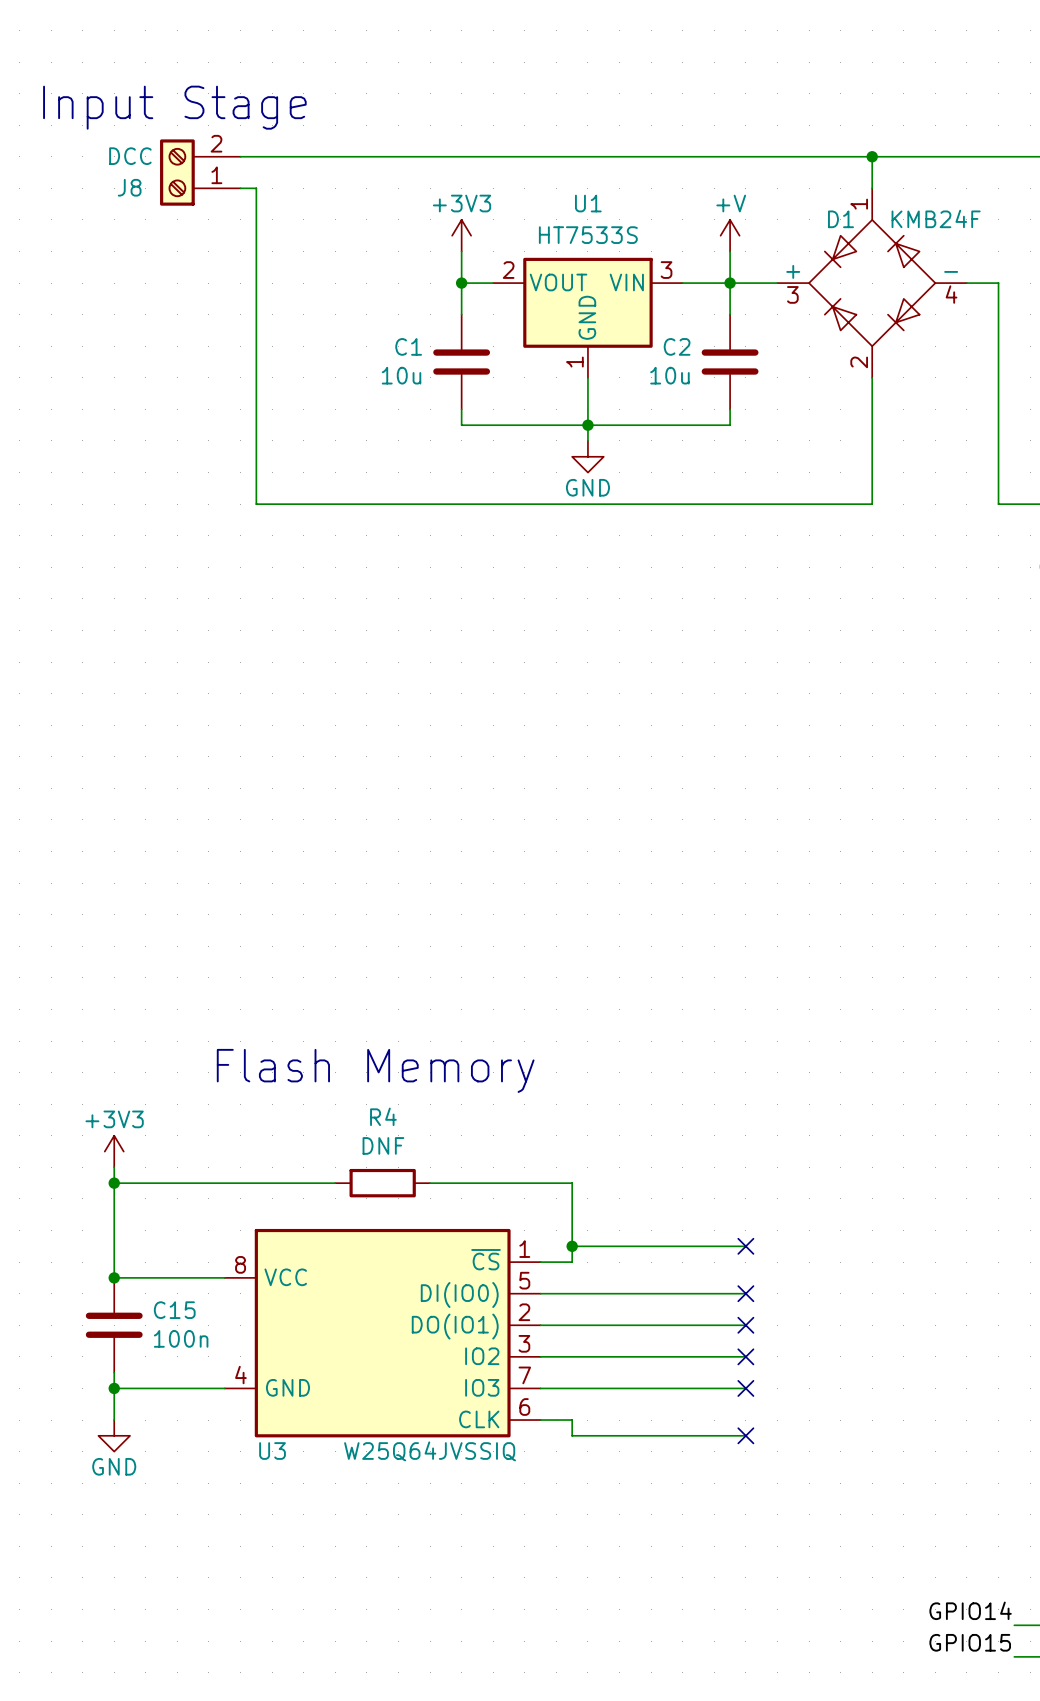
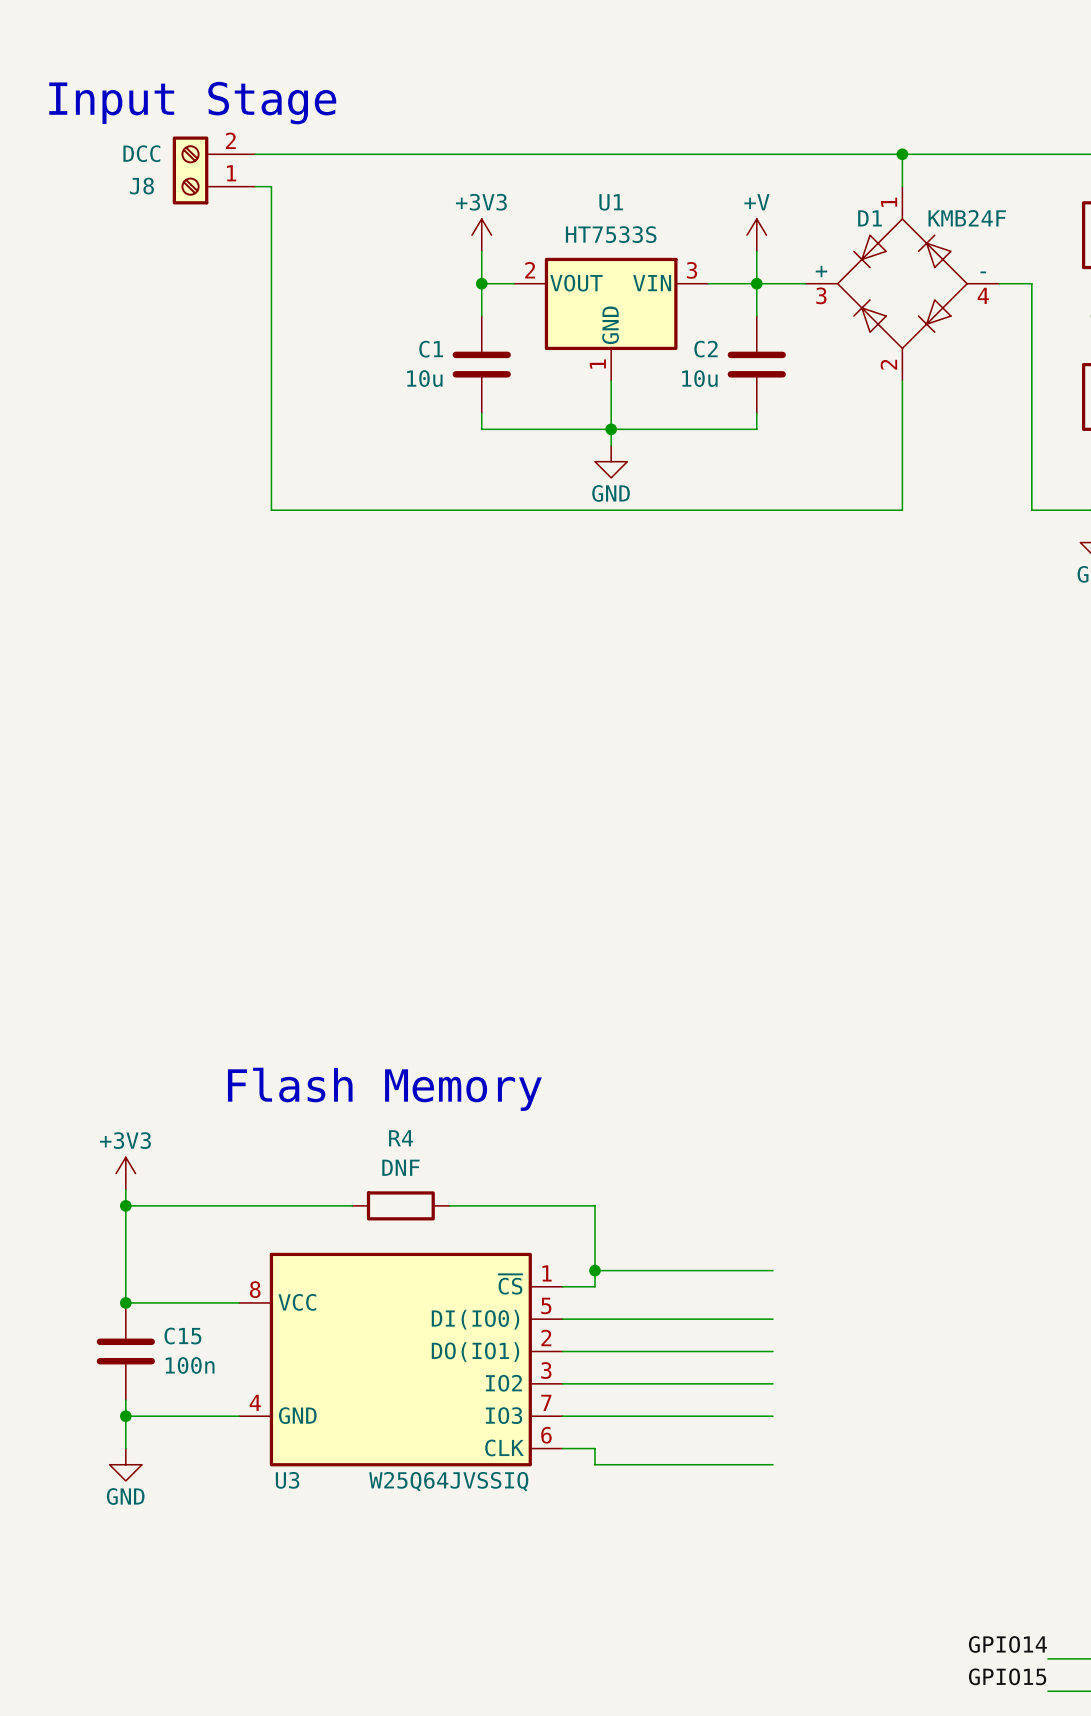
no-connect mark: (745, 1246) -> none
no-connect mark: (745, 1293) -> none
no-connect mark: (745, 1325) -> none
no-connect mark: (745, 1356) -> none
no-connect mark: (745, 1388) -> none
no-connect mark: (745, 1435) -> none

